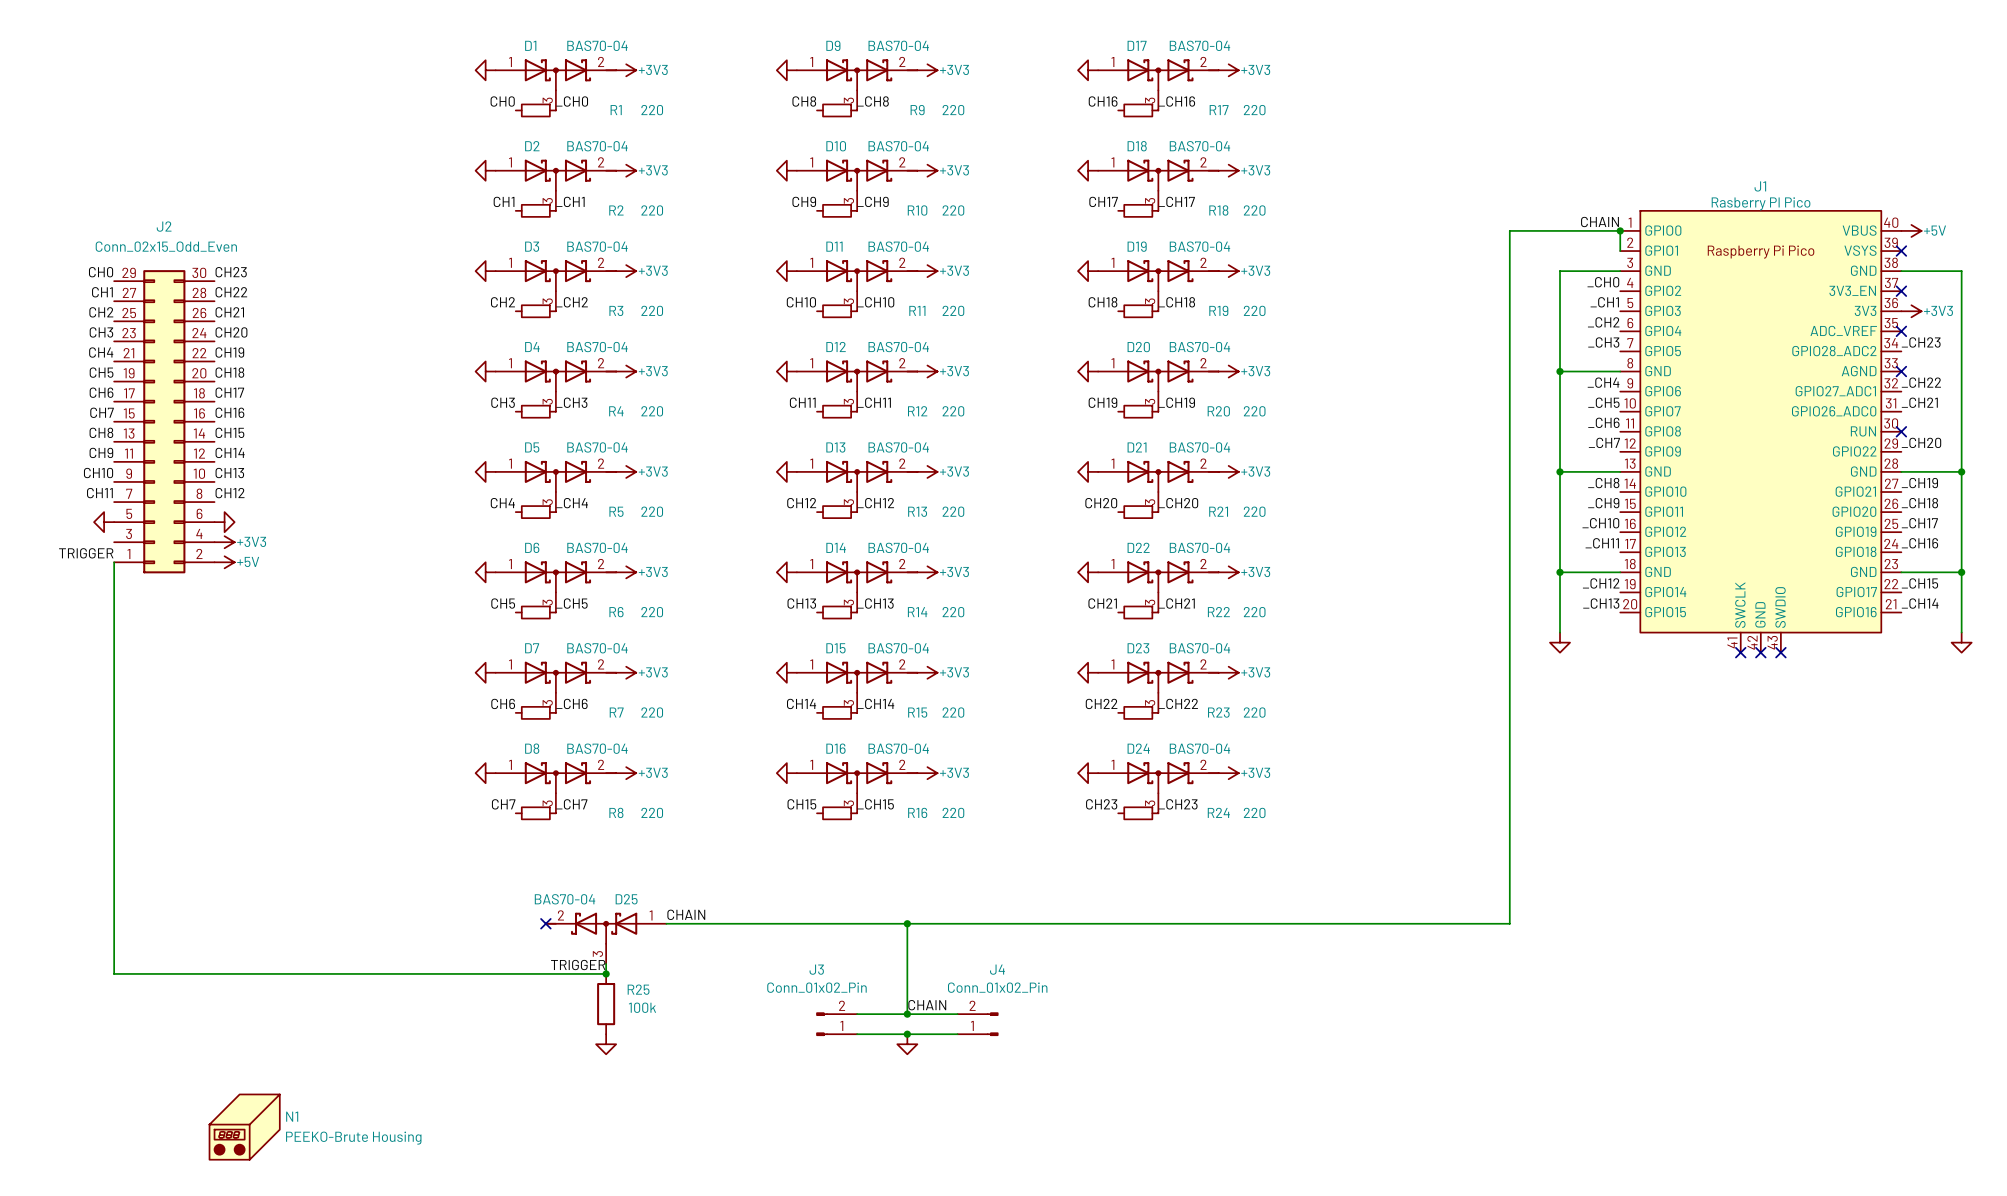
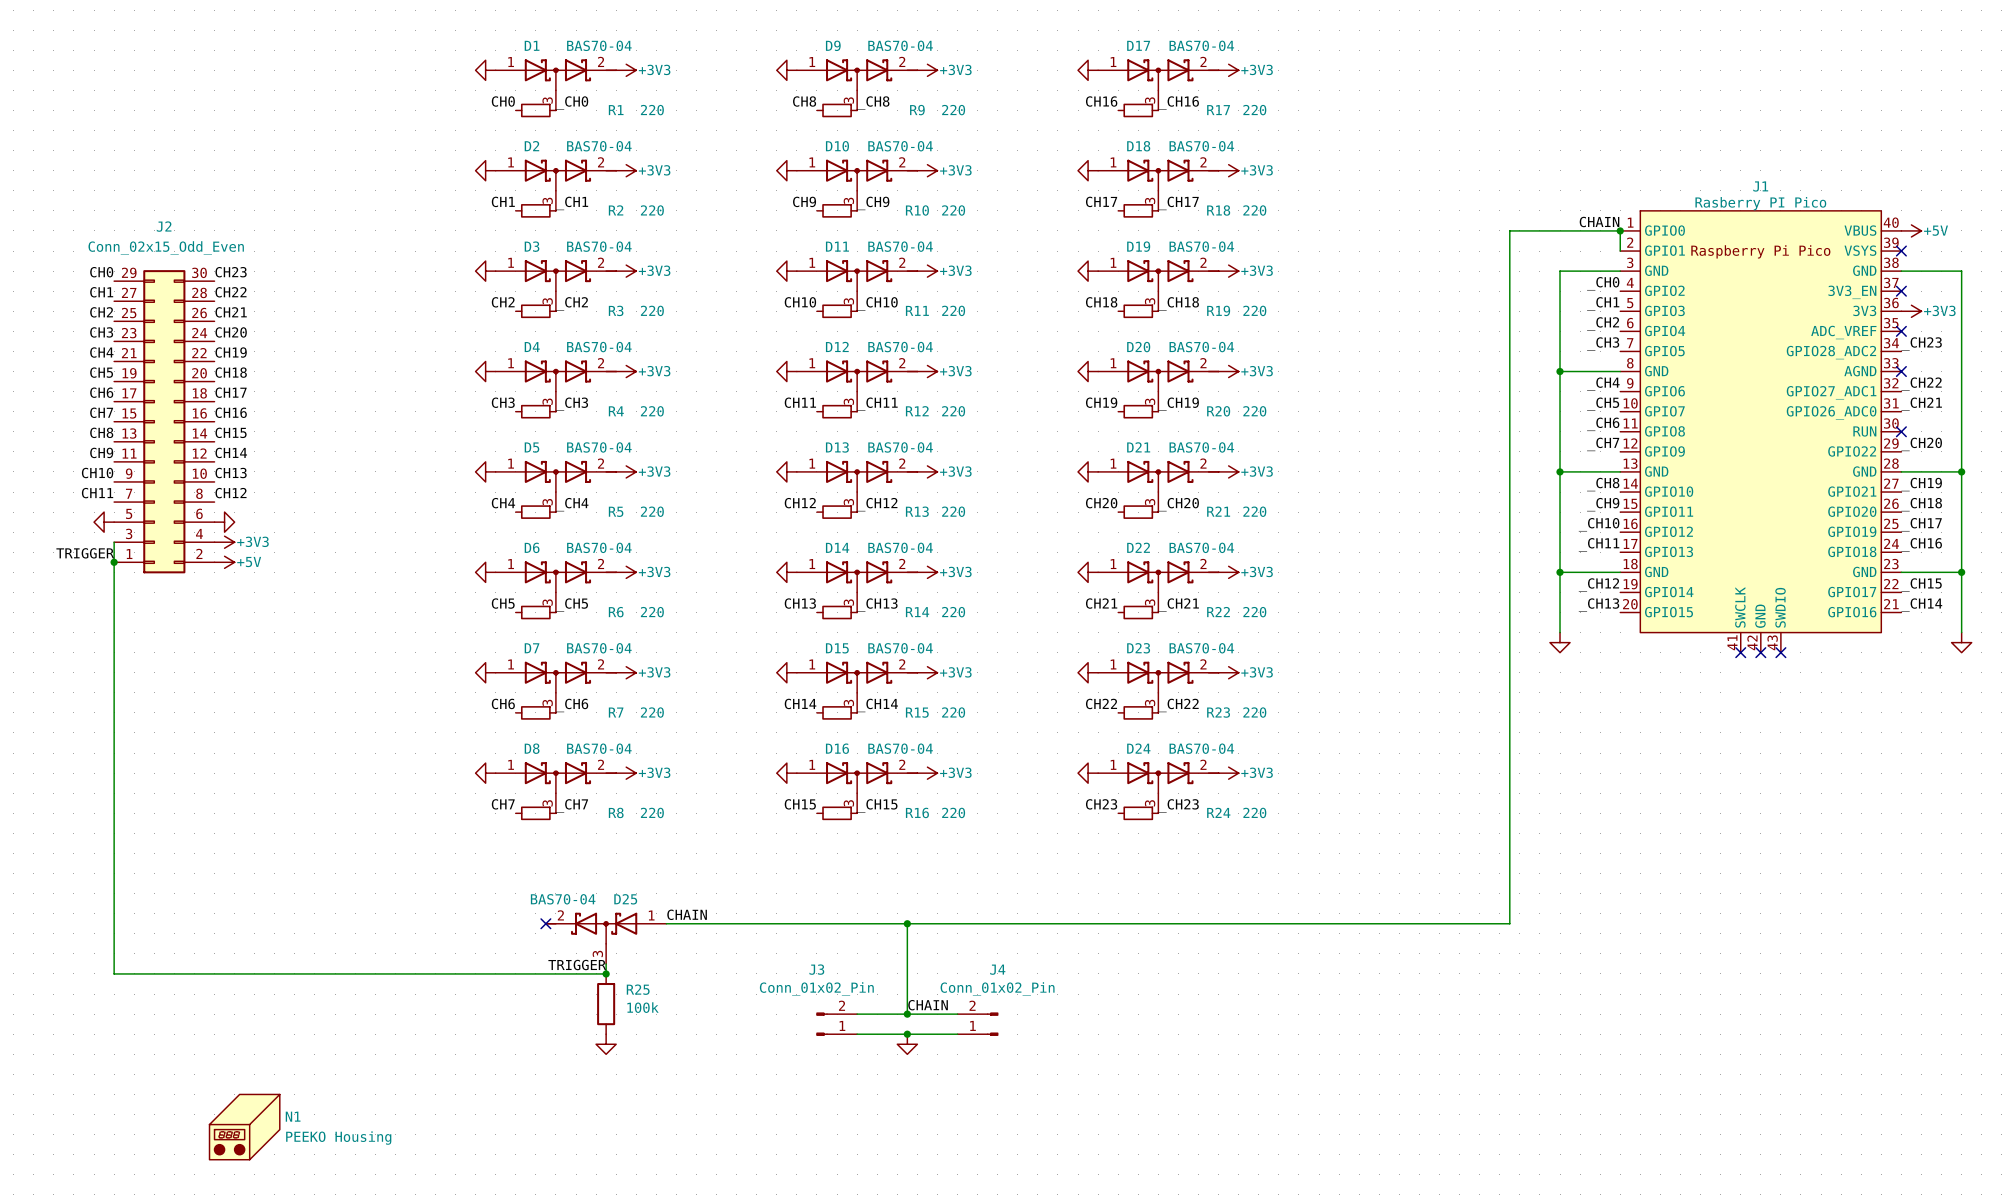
wire: none -> (114, 542) (114, 562)
junction: none -> (114, 562)
N1 value: PEEKO-Brute Housing (353, 1138) -> PEEKO Housing (338, 1138)

